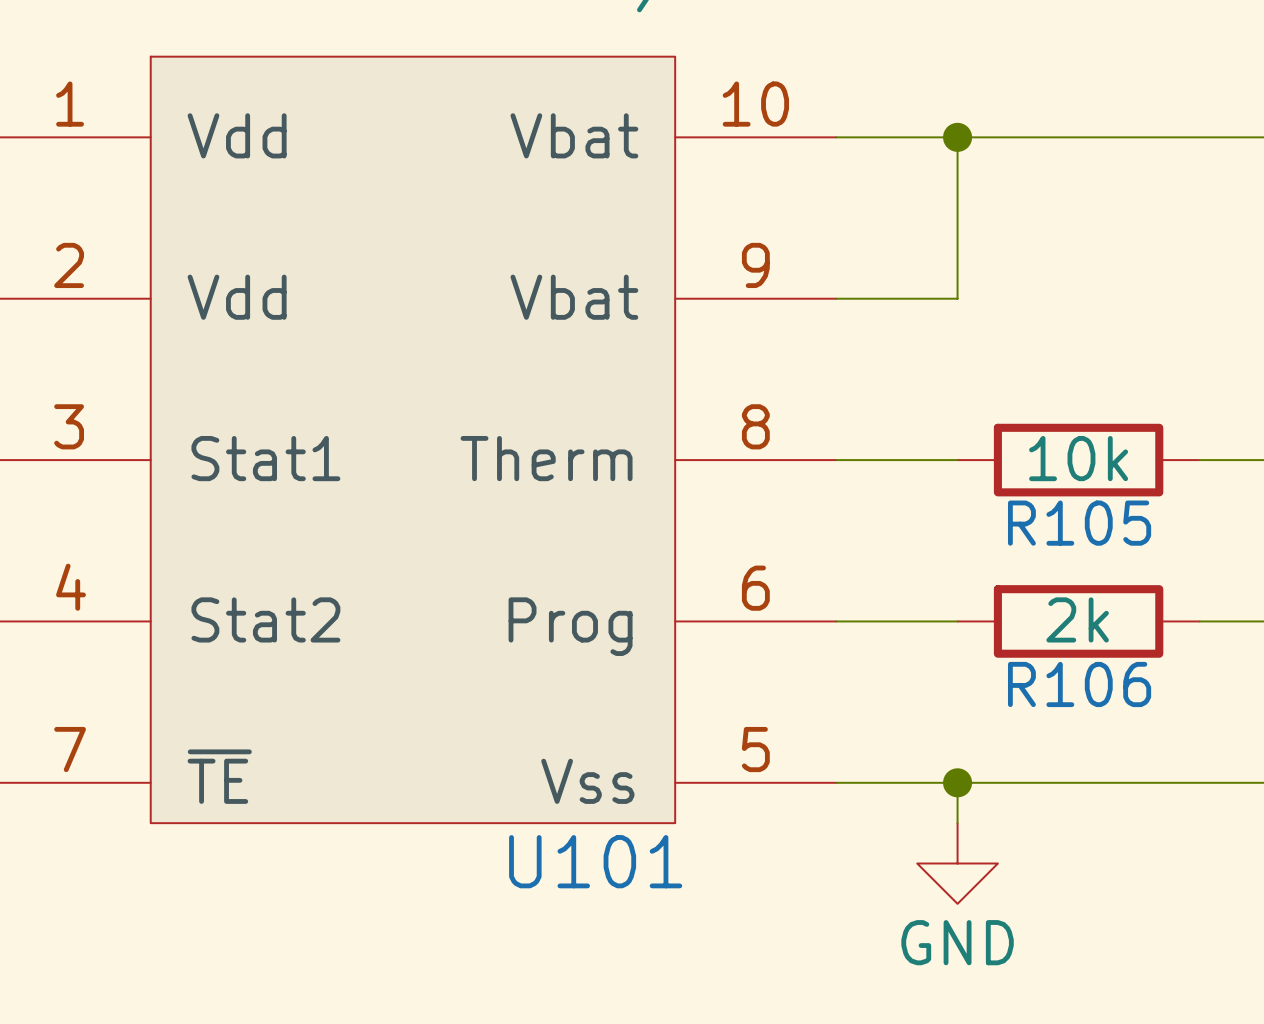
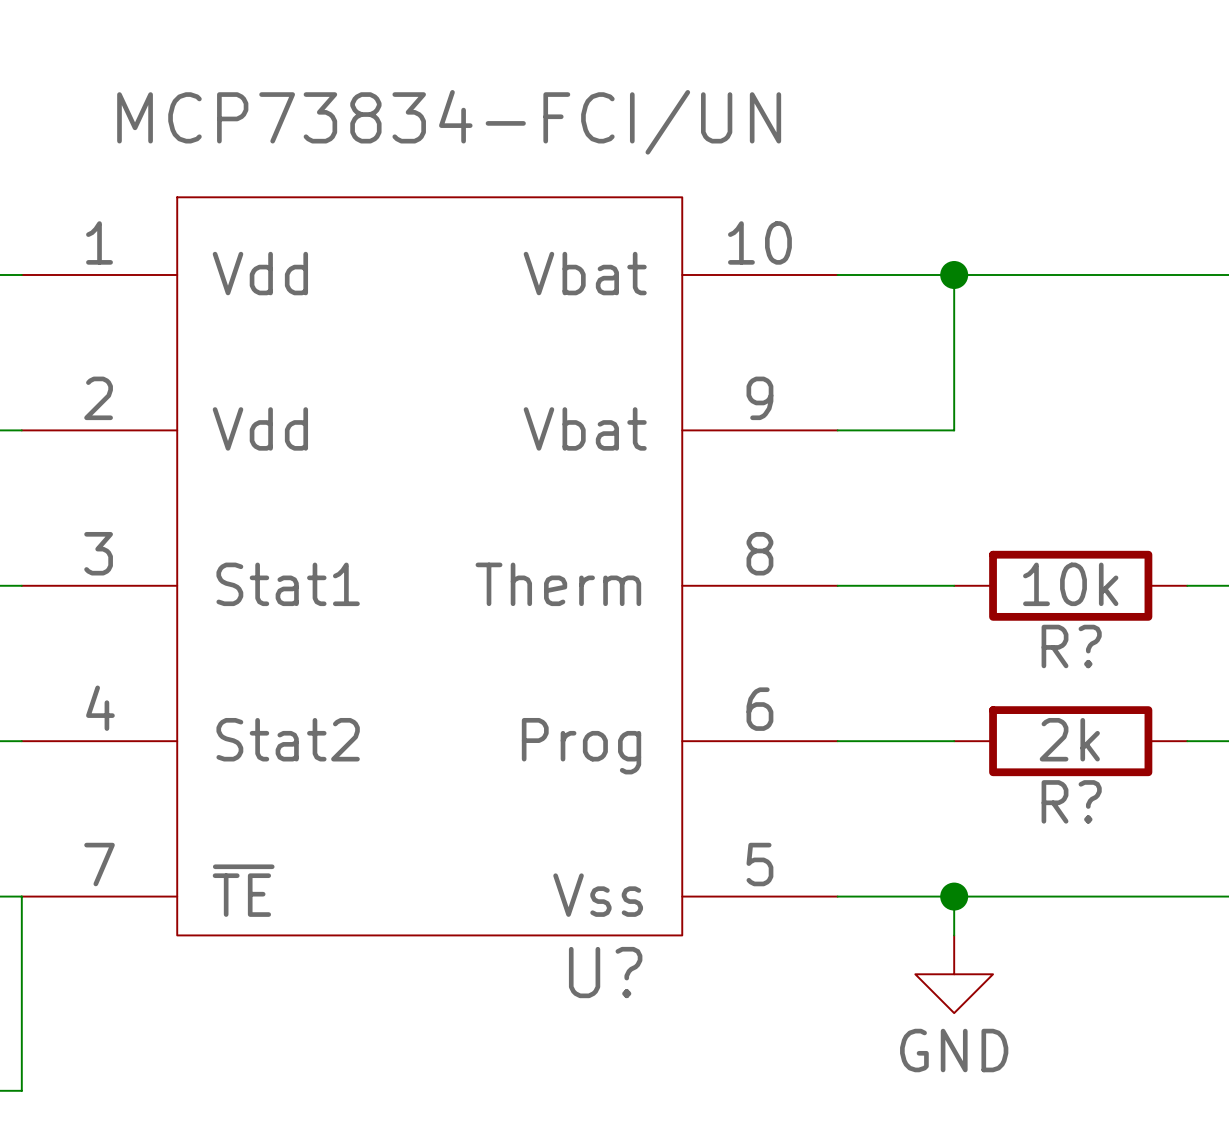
R105 name: R105 (1079, 523) -> R? (1071, 646)
R106 name: R106 (1079, 684) -> R? (1071, 801)
U101 name: U101 (595, 861) -> U? (605, 972)

